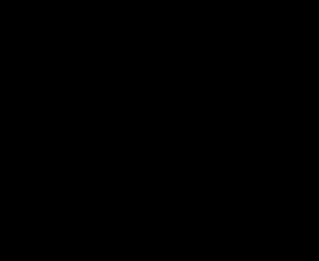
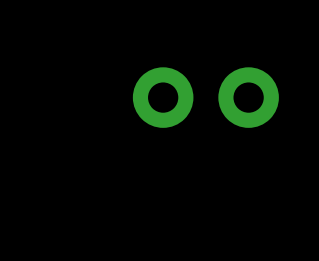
part: none -> (205, 97)

